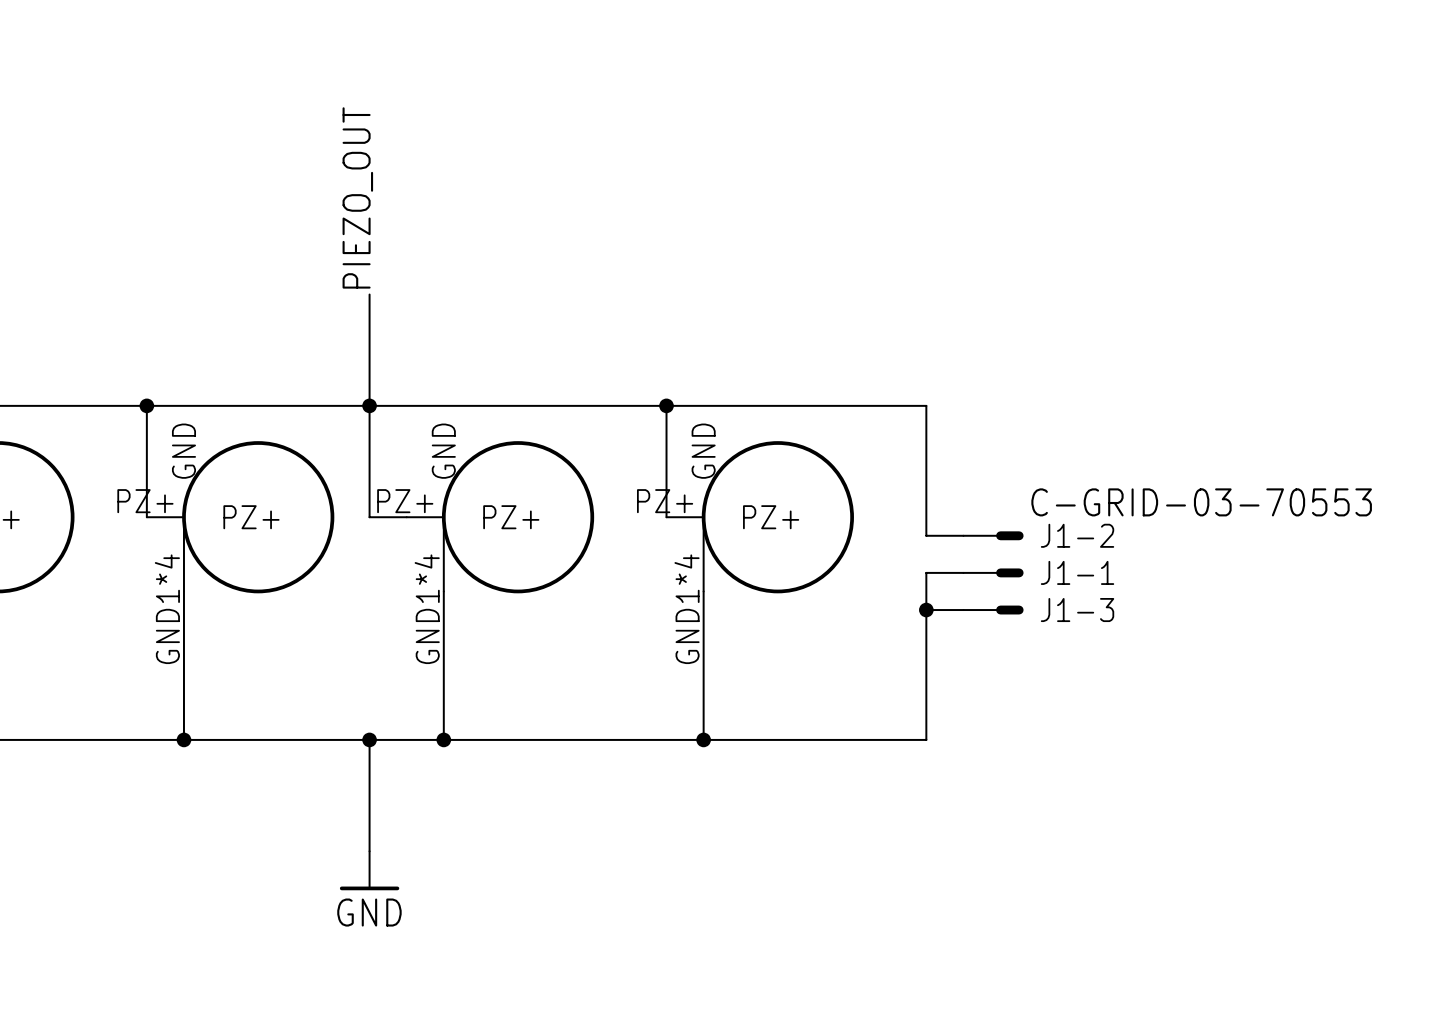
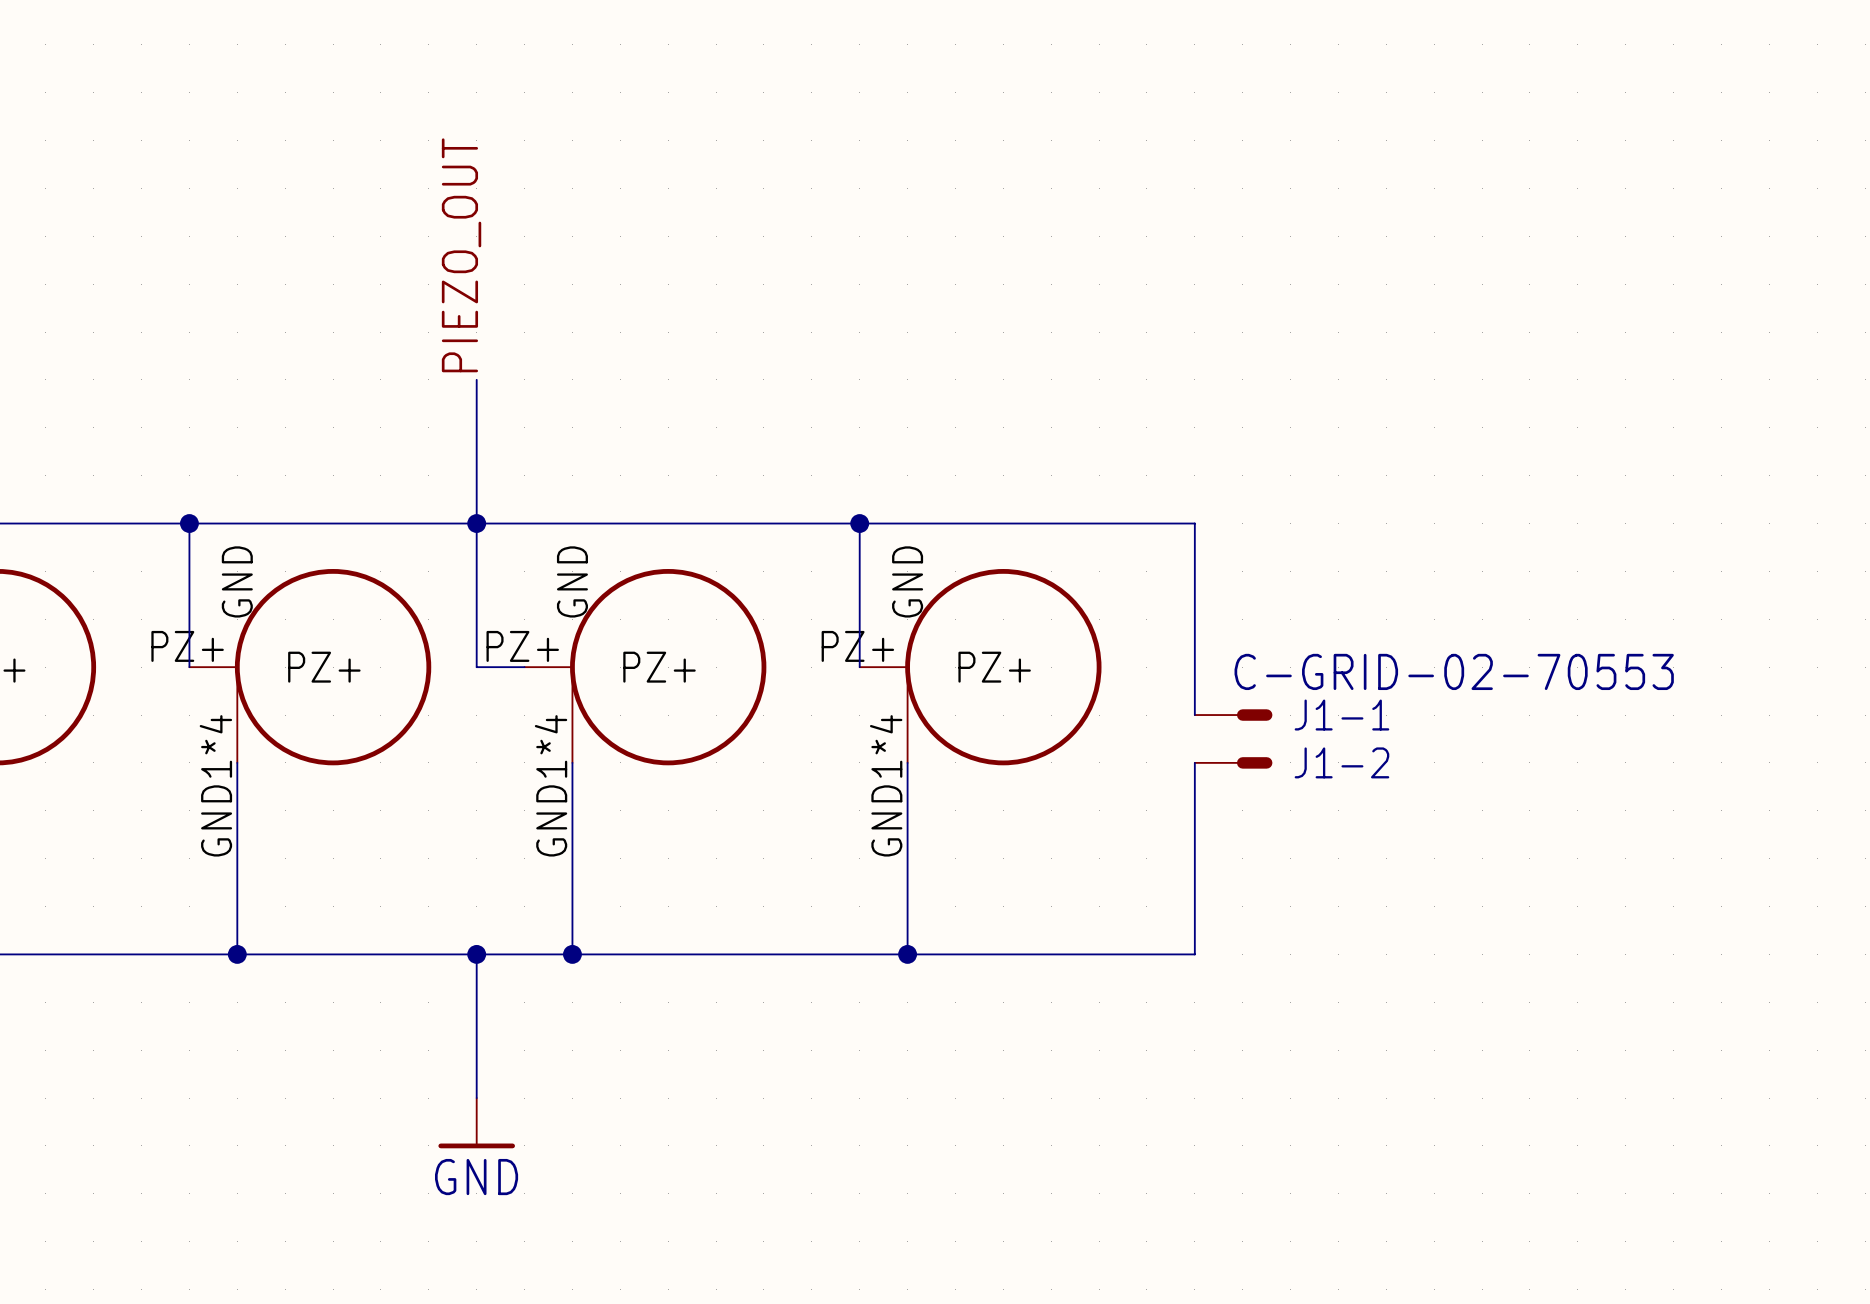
J1-1 value: C-GRID-03-70553 (1201, 502) -> C-GRID-02-70553 (1454, 671)
wire: (926, 535) (963, 535) -> (1194, 691) (1194, 715)
J1-2 position: (993, 535) -> (1233, 762)
wire: (963, 572) (926, 572) (926, 591) -> none
J1-1 position: (993, 572) -> (1233, 715)
wire: (926, 610) (963, 610) -> none
junction: (926, 610) -> none
J1-3: (993, 610) -> none

